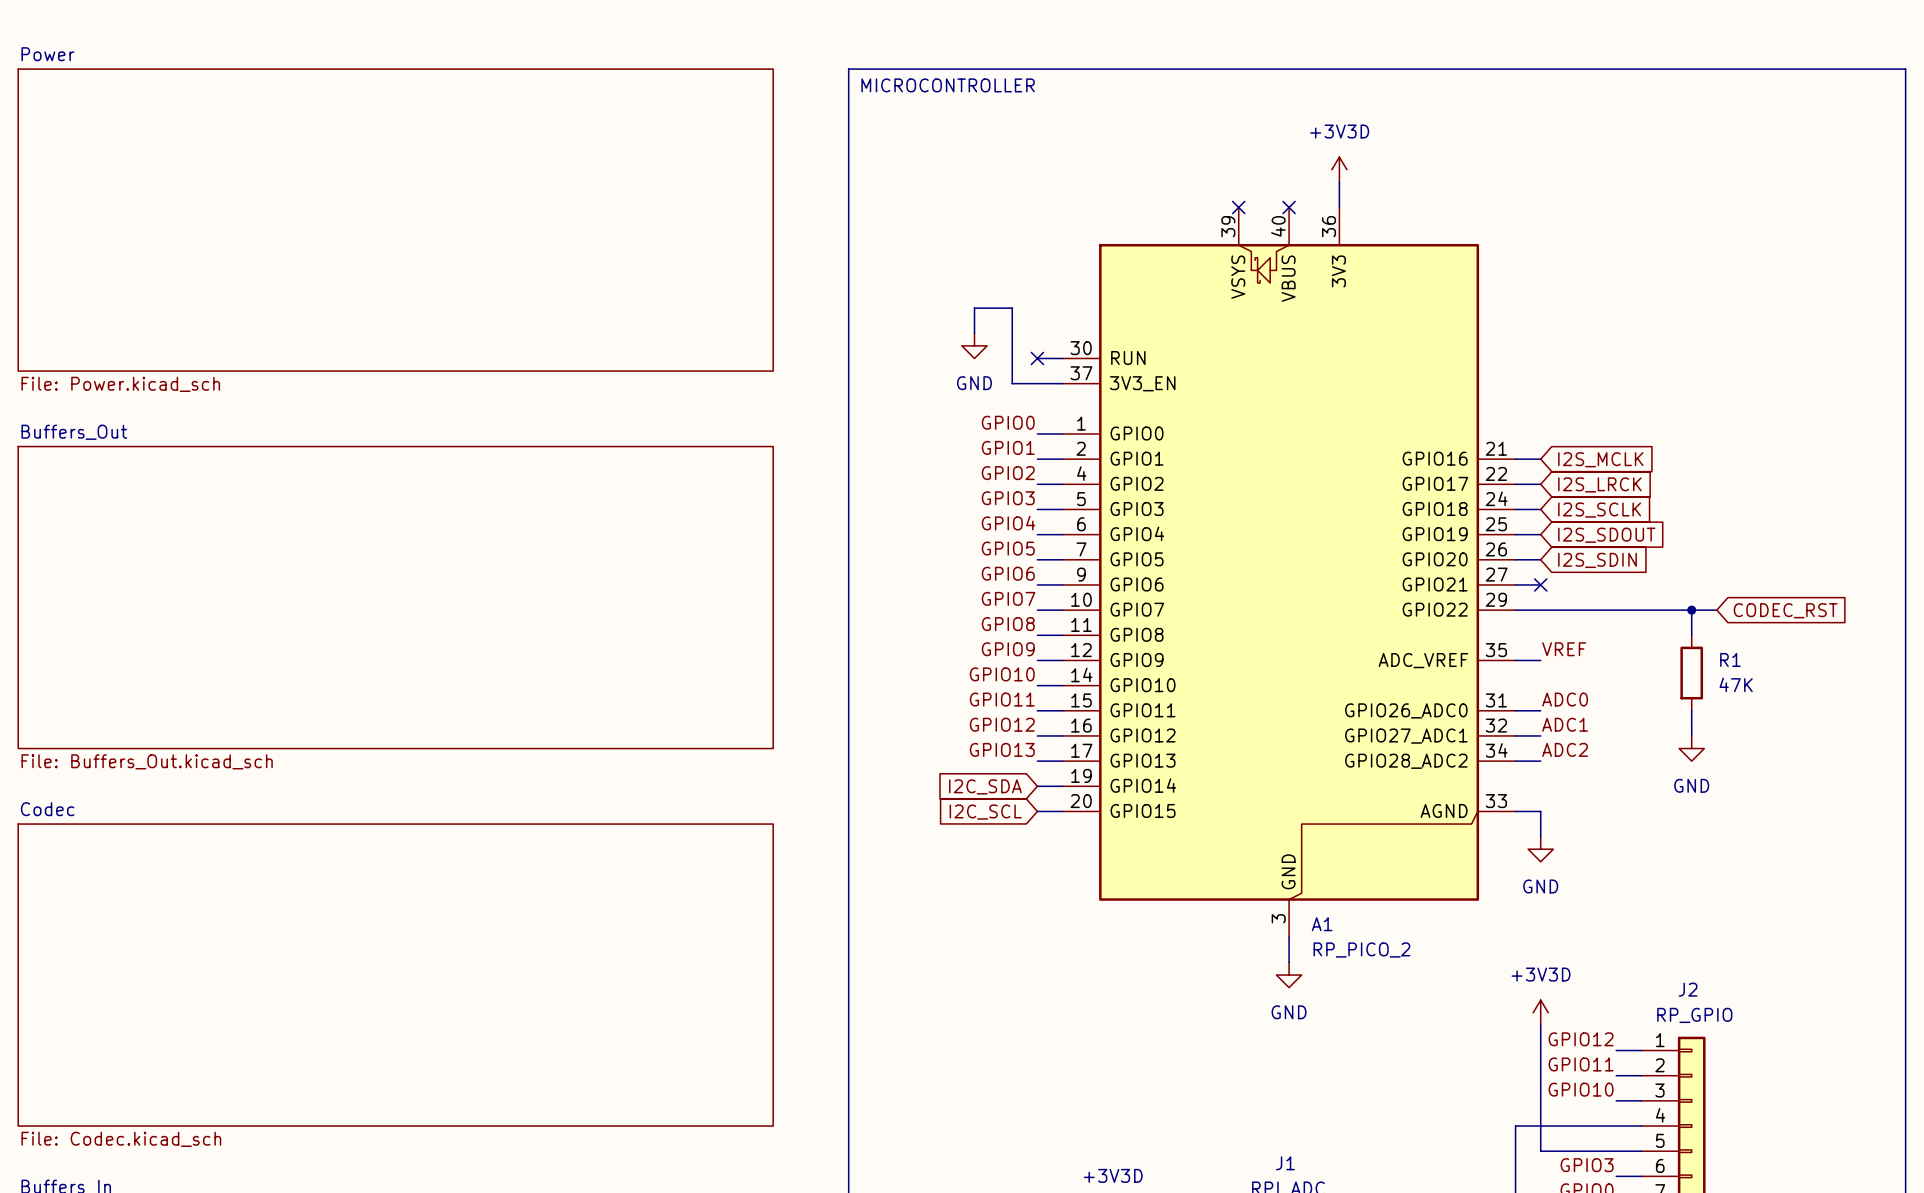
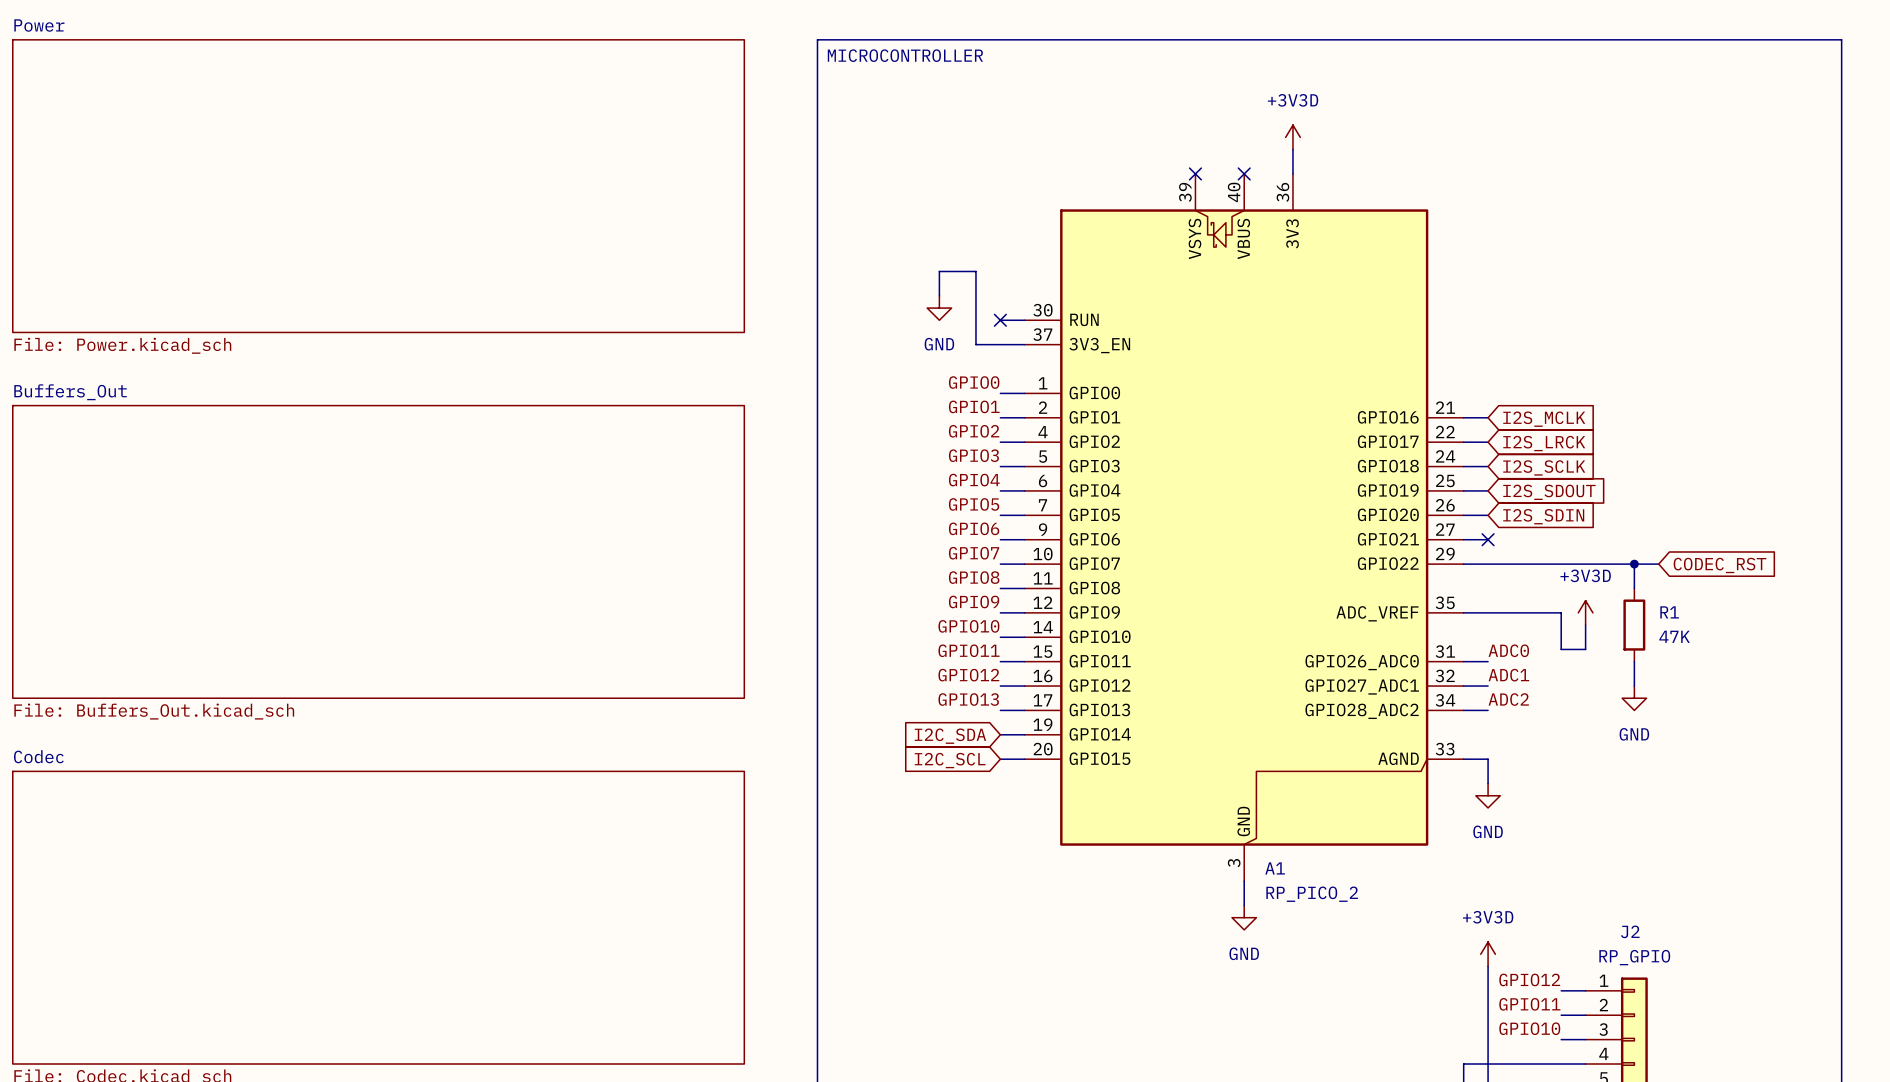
label: VREF (1564, 649) -> none
wire: none -> (1488, 612) (1561, 612) (1561, 649) (1585, 649) (1585, 625)
power symbol: none -> +3V3D (1585, 612)

